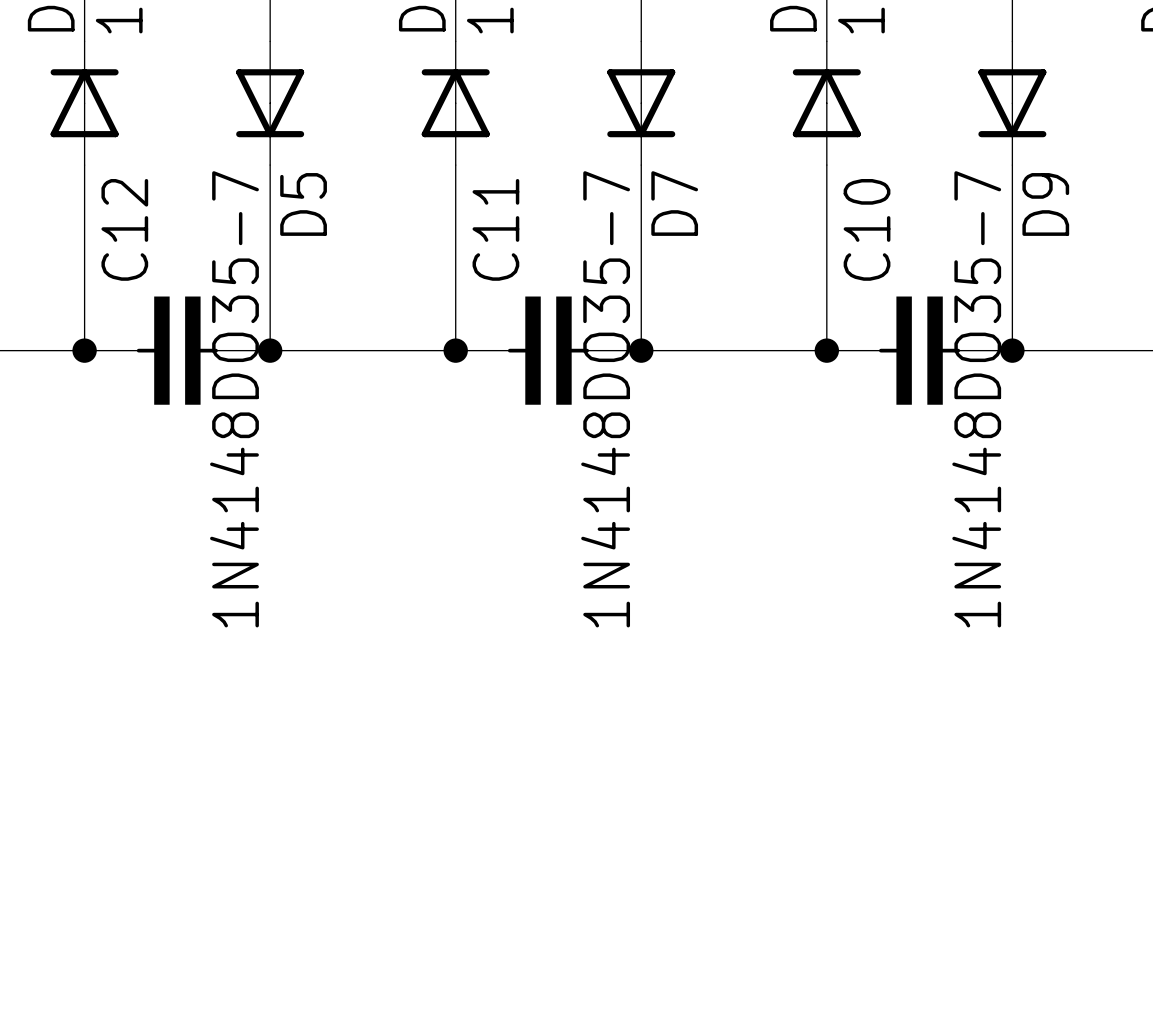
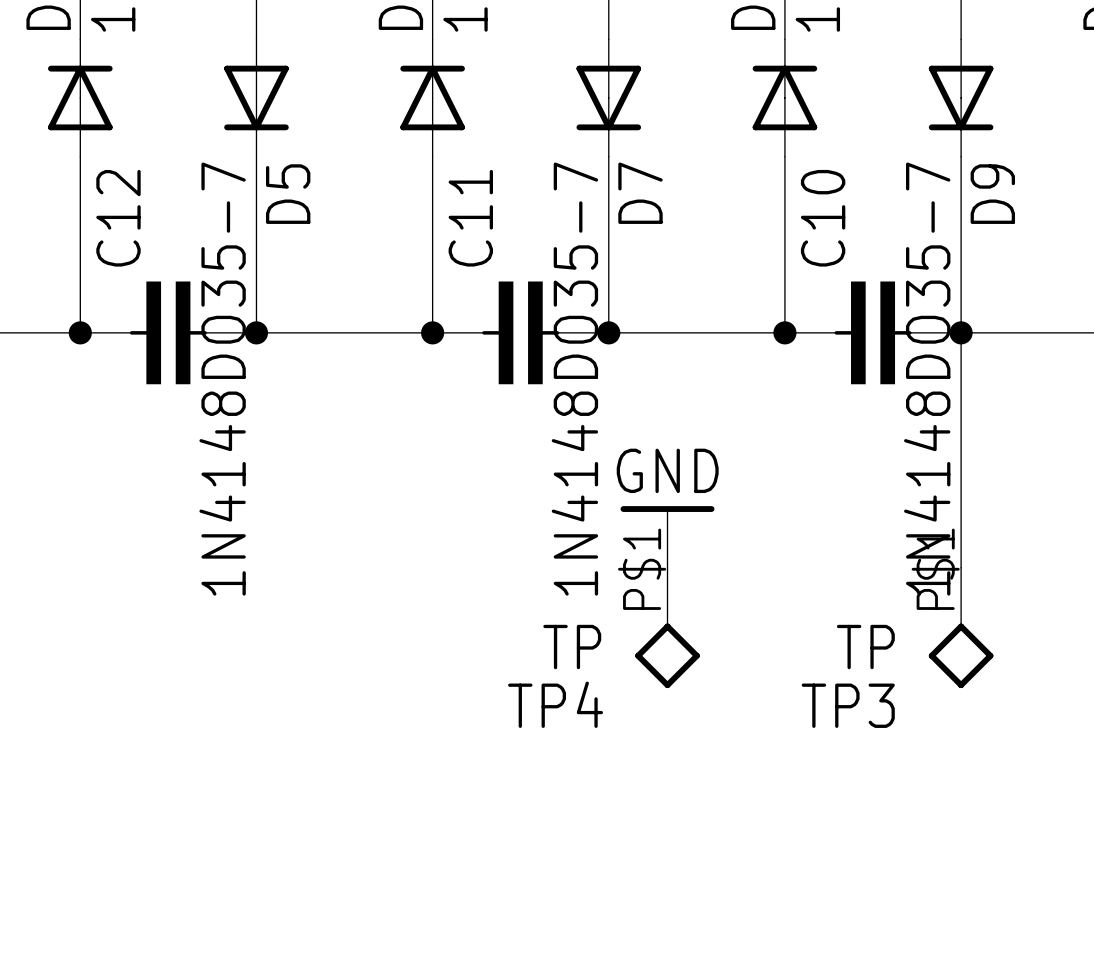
wire: none -> (961, 332) (961, 567)
power symbol: none -> GND (667, 536)
TP4: none -> TP (667, 627)
TP3: none -> TP (961, 627)

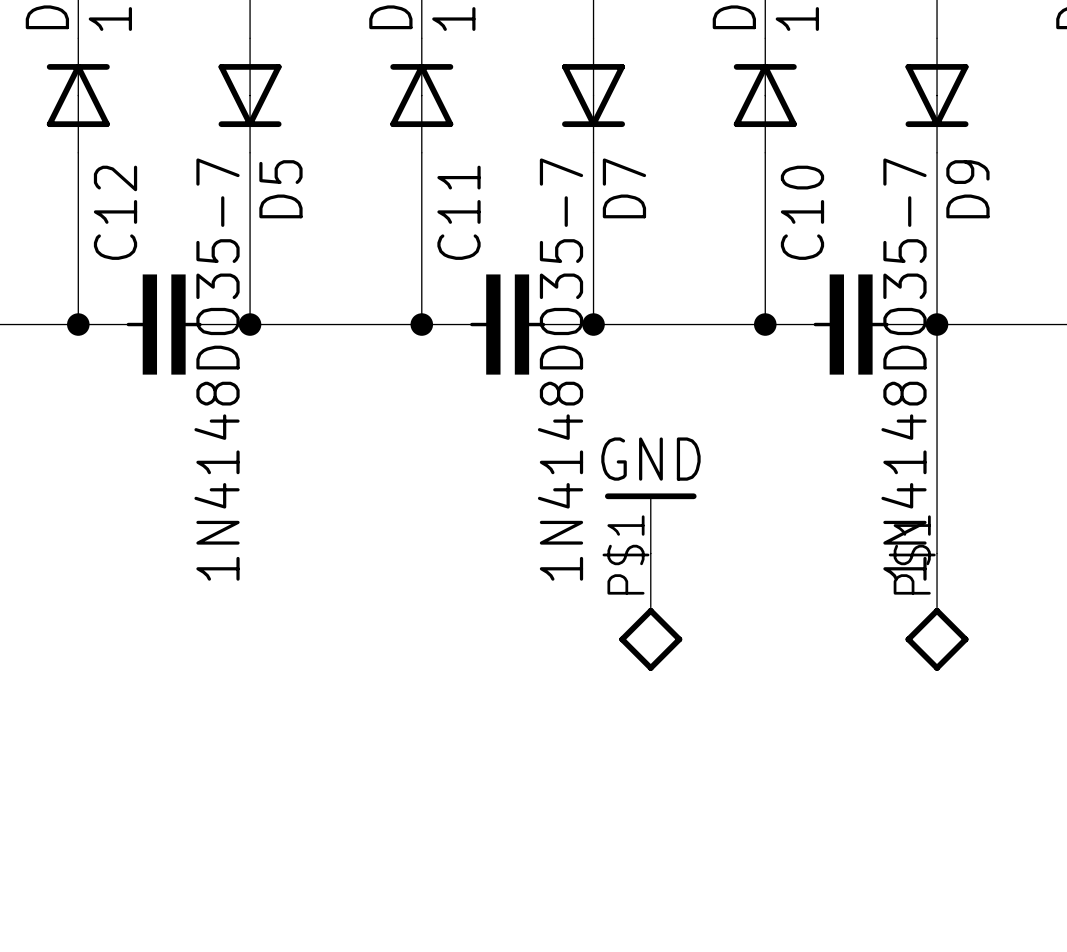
TP4 value: TP (572, 647) -> none
TP3 value: TP (865, 647) -> none
TP4 name: TP4 (555, 704) -> none
TP3 name: TP3 (848, 705) -> none

